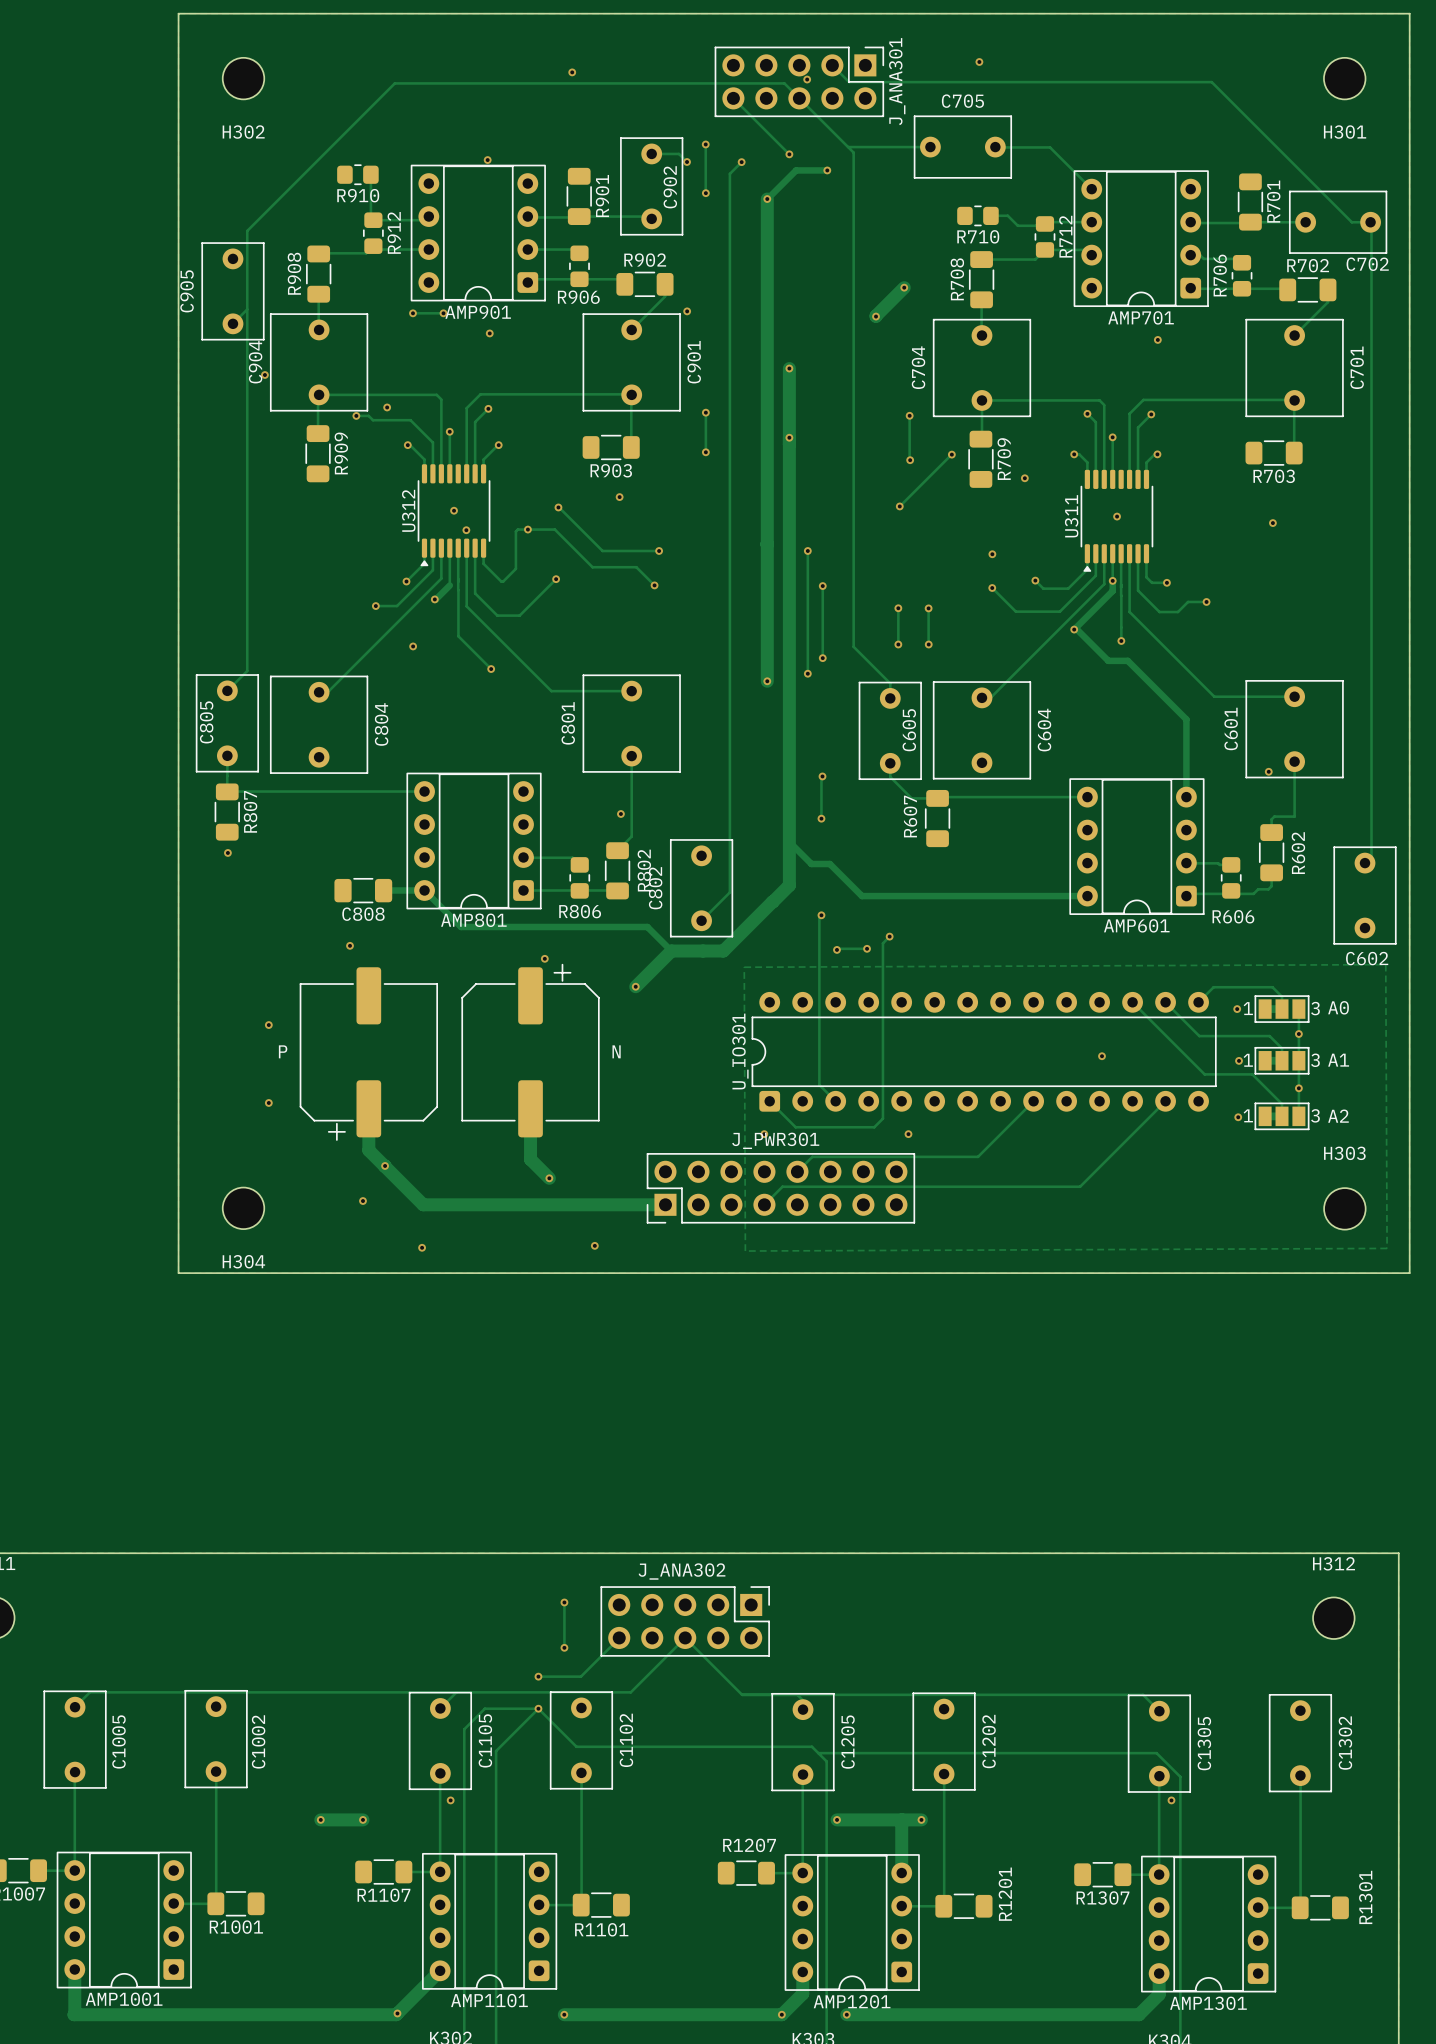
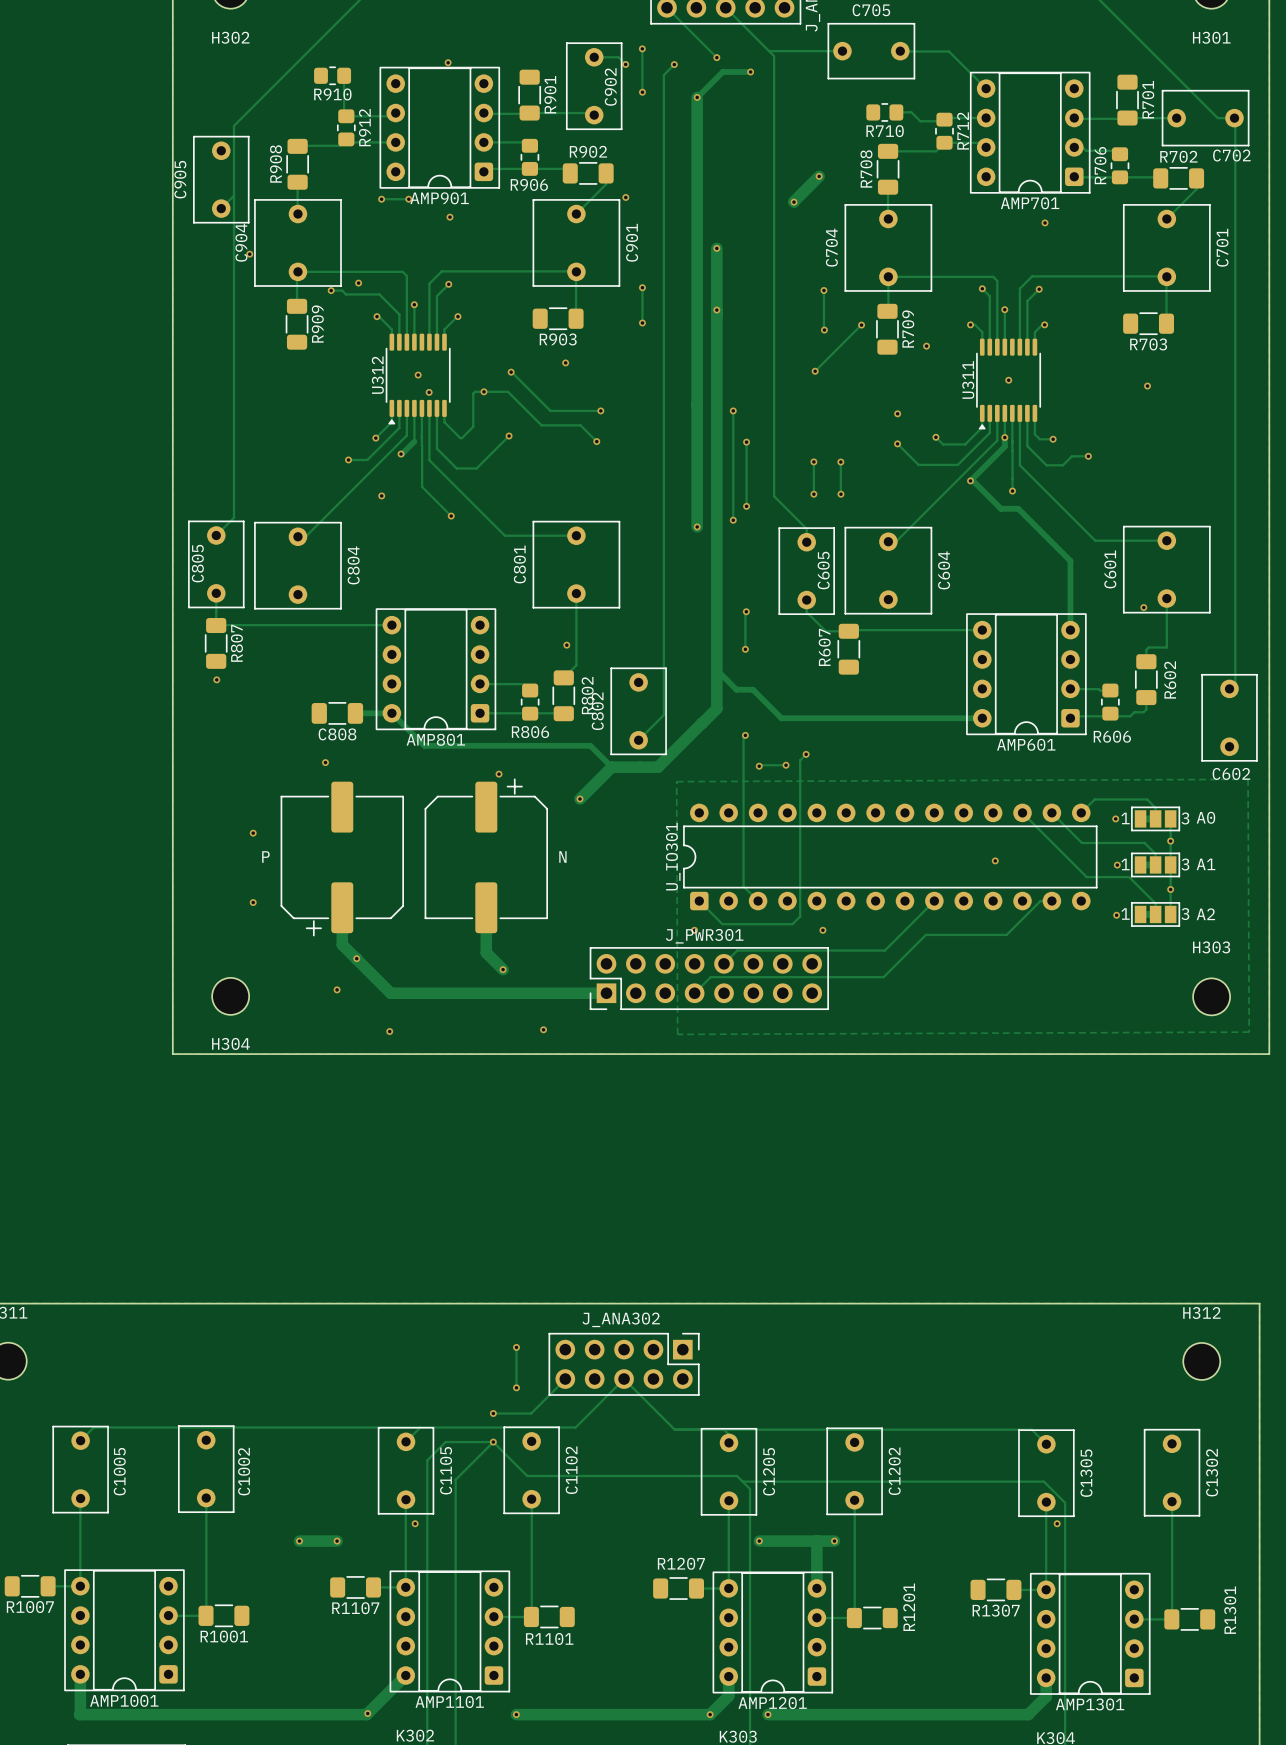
track: (1165, 1101) (1080, 1186) (976, 1186) -> (1051, 901) (1040, 901) (1006, 934) (925, 934) (883, 977)

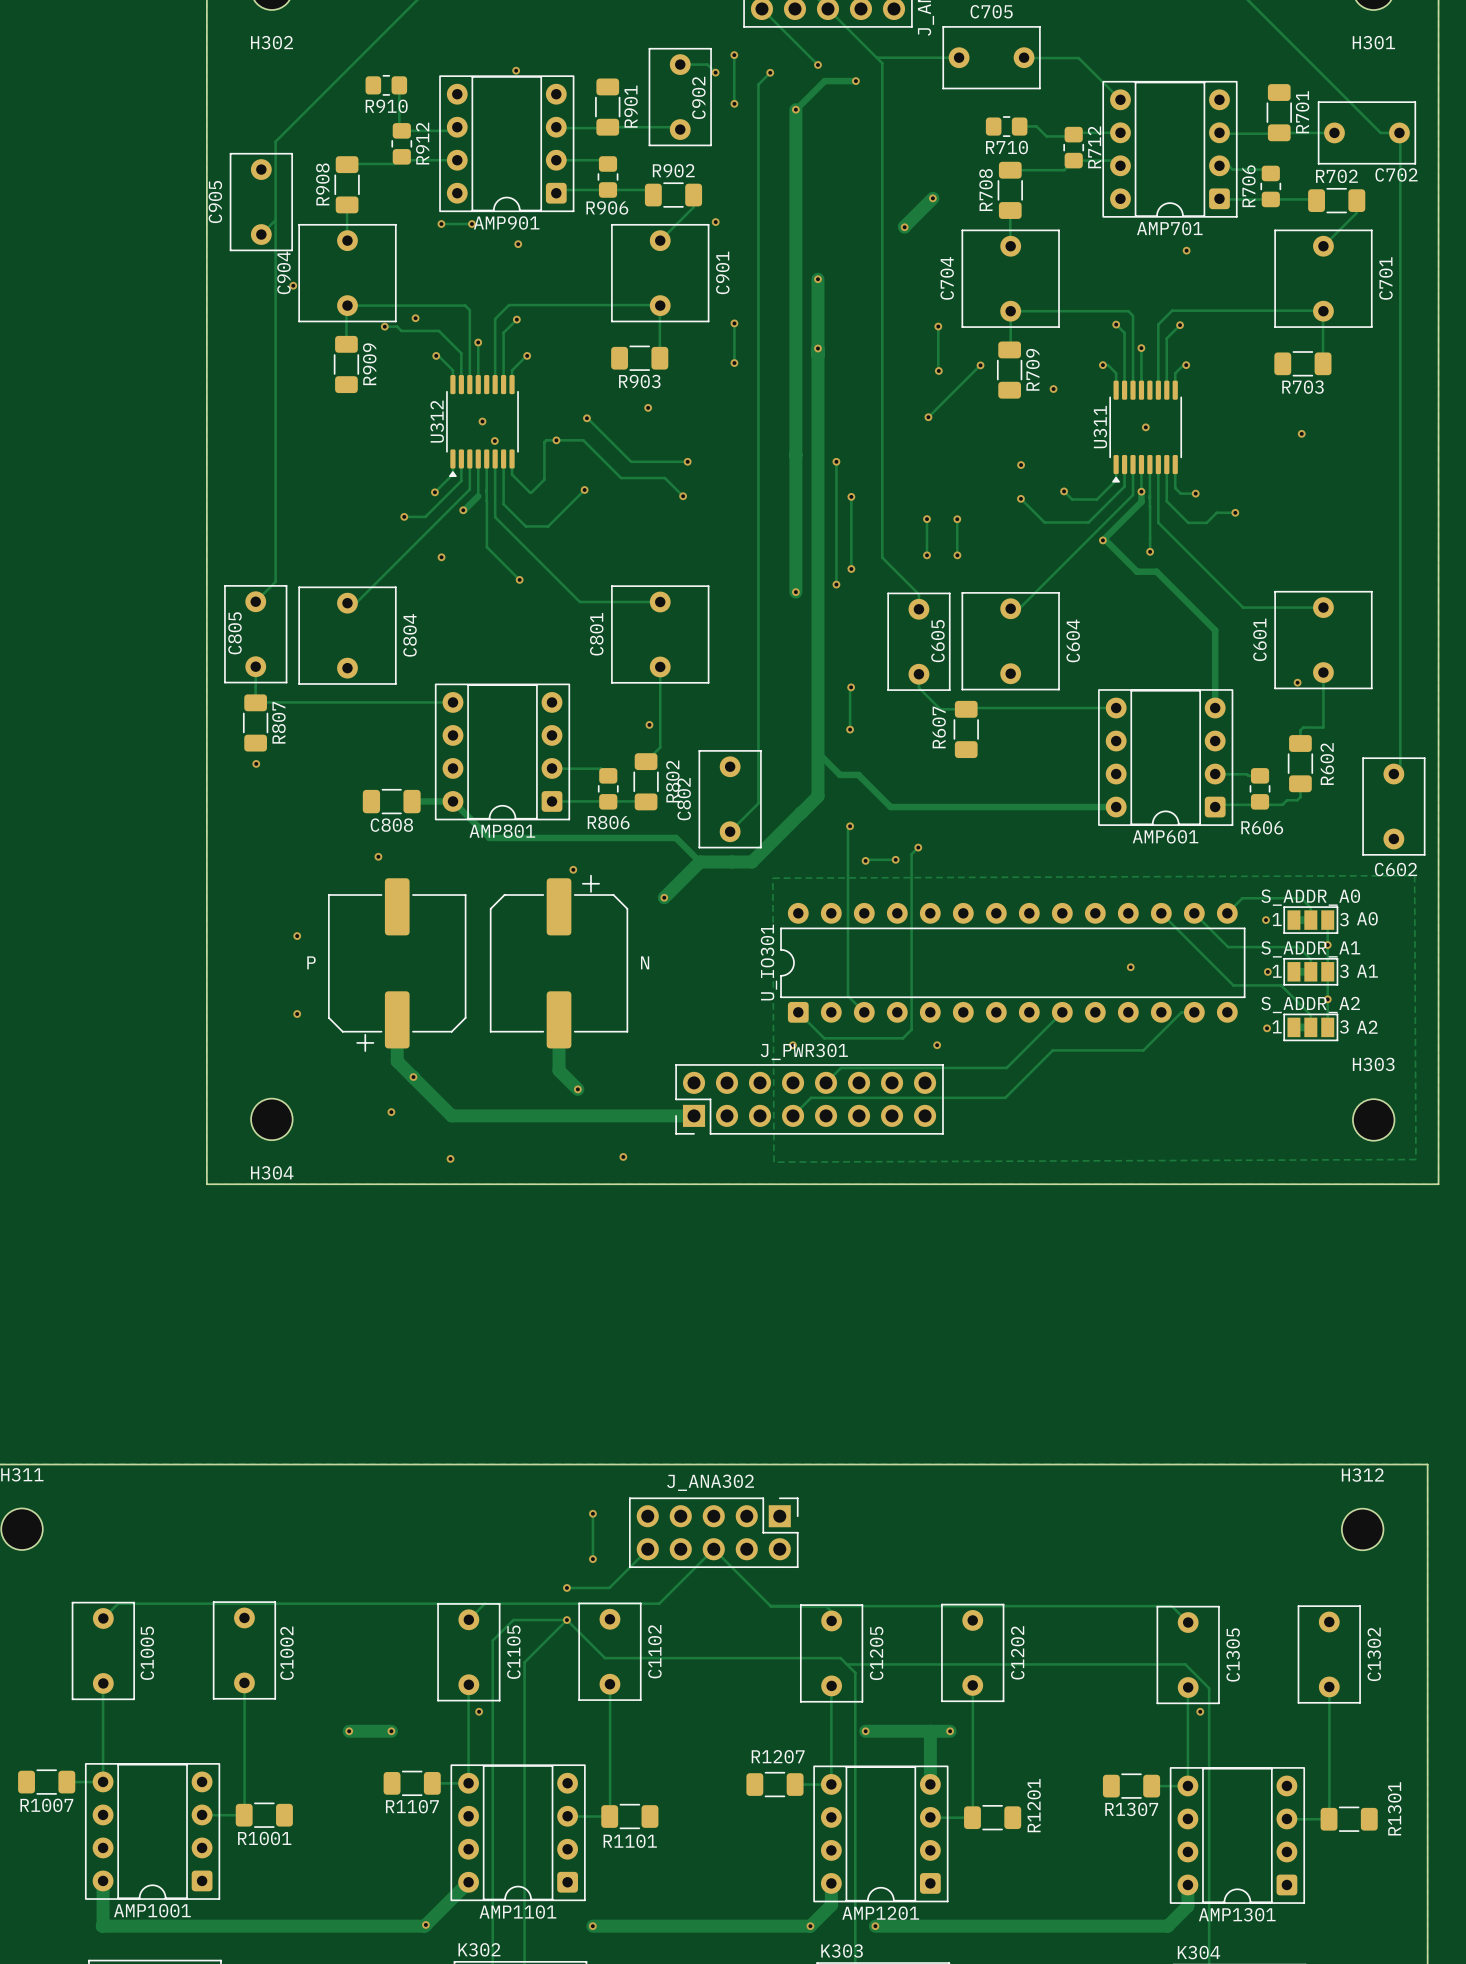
S_ADDR_A0 name: none -> S_ADDR_A0 (1310, 897)
S_ADDR_A1 name: none -> S_ADDR_A1 (1310, 949)
S_ADDR_A2 name: none -> S_ADDR_A2 (1310, 1004)

